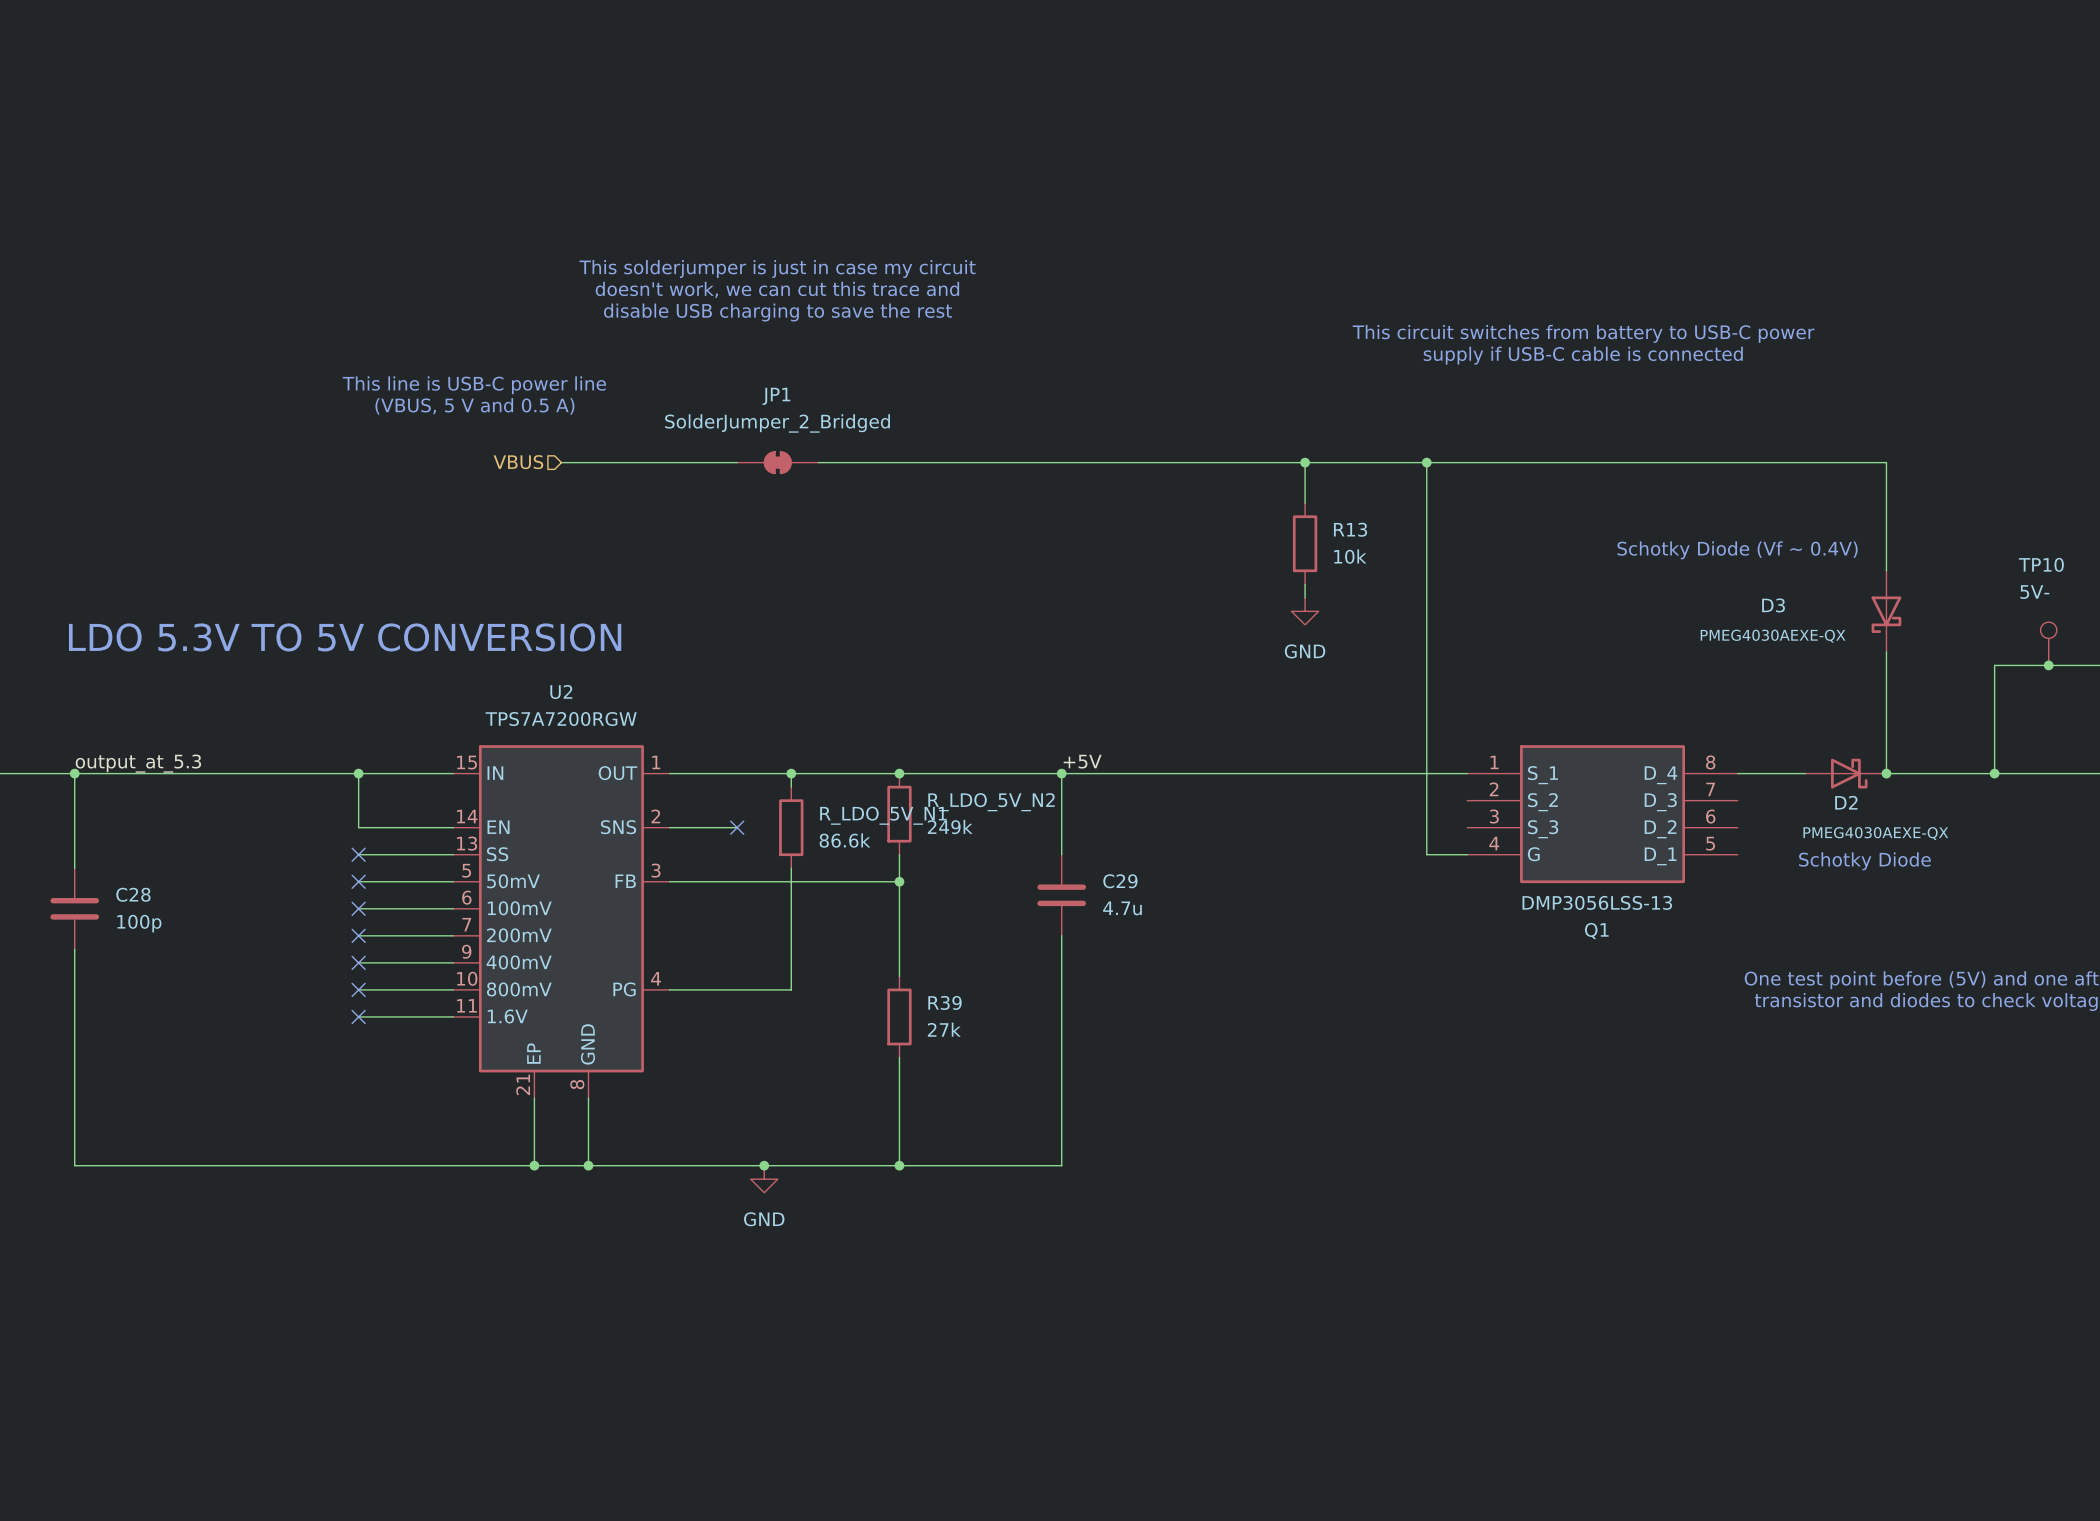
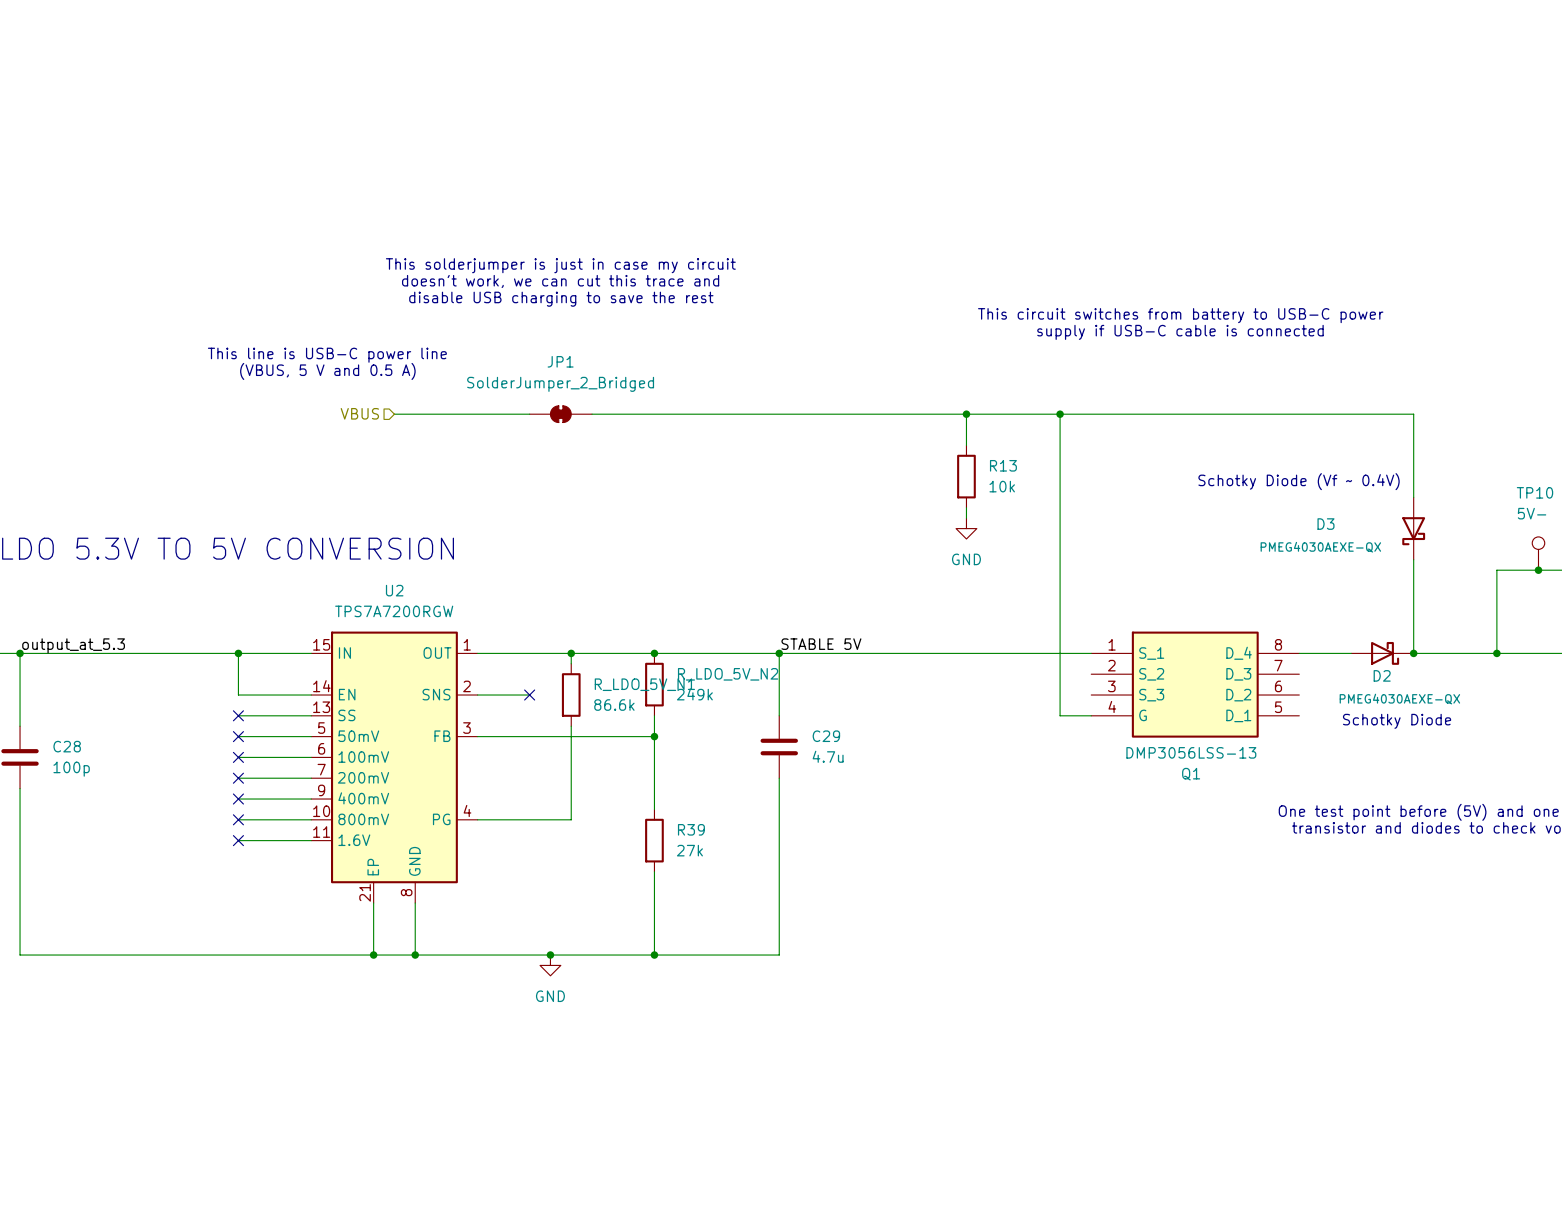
label: +5V (1082, 761) -> STABLE 5V (821, 644)

